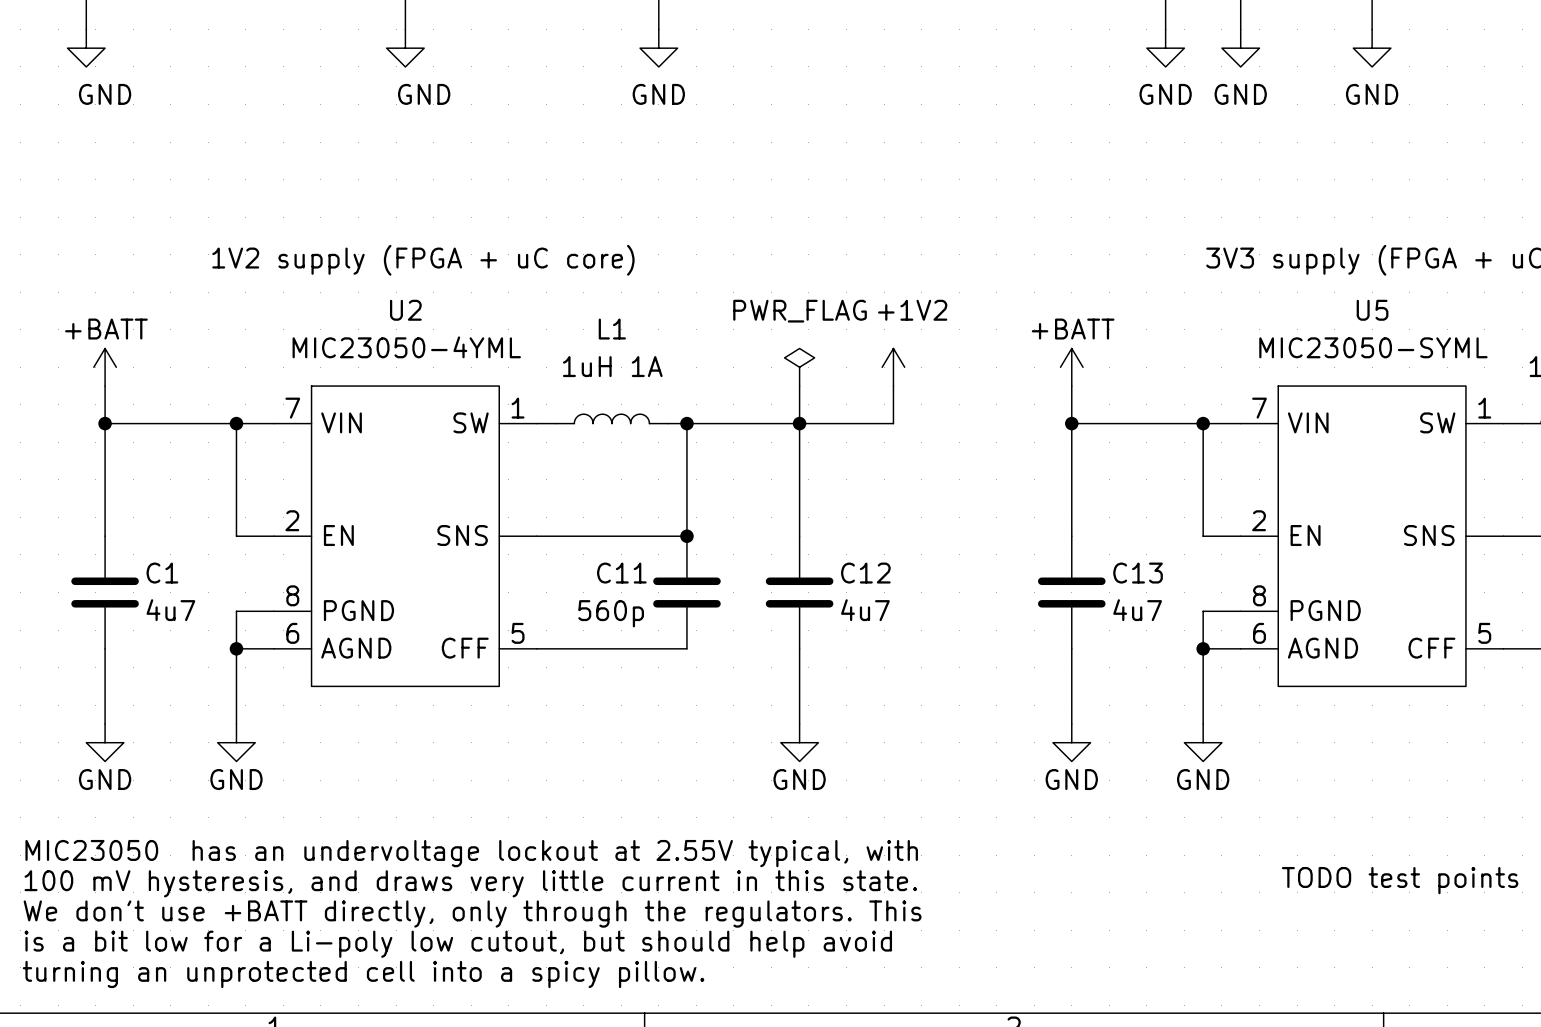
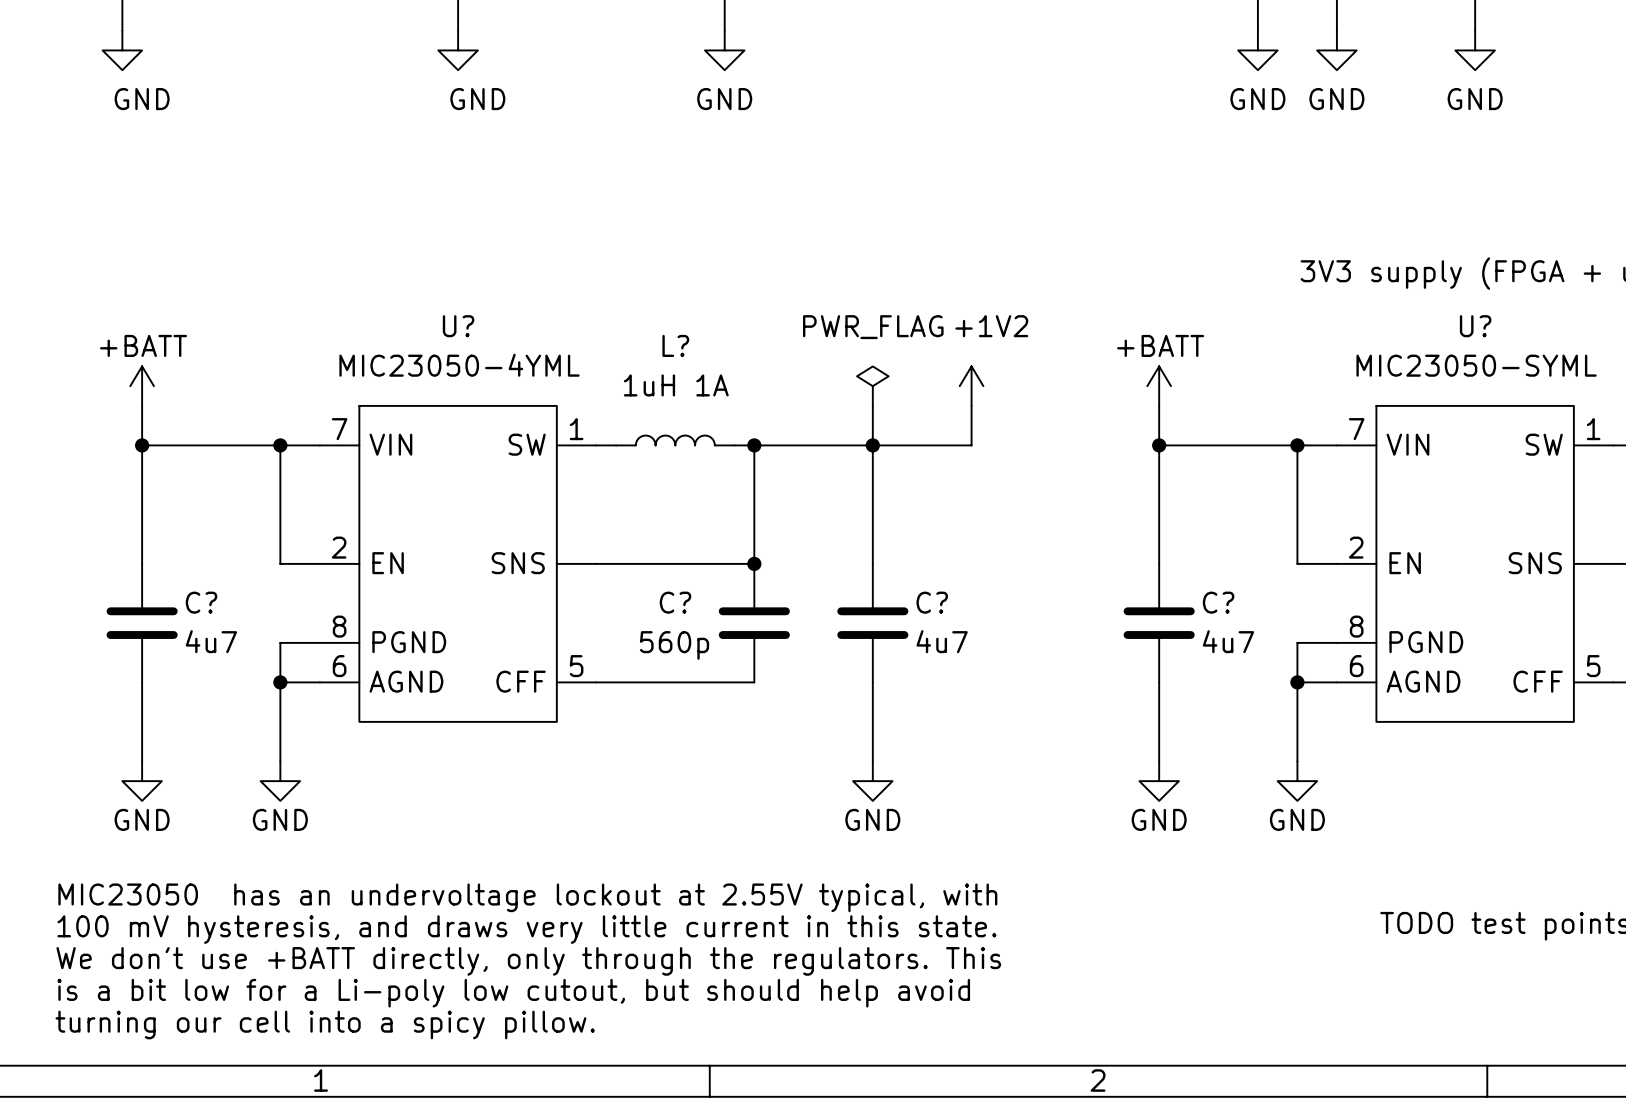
text: 1V2 supply (FPGA + uC core) (423, 260) -> none
U2 name: U2 (405, 310) -> U? (458, 326)
U5 name: U5 (1372, 310) -> U? (1475, 326)
L1 name: L1 (612, 329) -> L? (675, 345)
C1 name: C1 (162, 573) -> C? (201, 602)
C11 name: C11 (621, 573) -> C? (675, 602)
C12 name: C12 (865, 573) -> C? (932, 602)
C13 name: C13 (1138, 573) -> C? (1218, 602)
text: turning an unprotected cell into a spicy pillow. (363, 974) -> turning our cell into a spicy pillow. (325, 1024)

